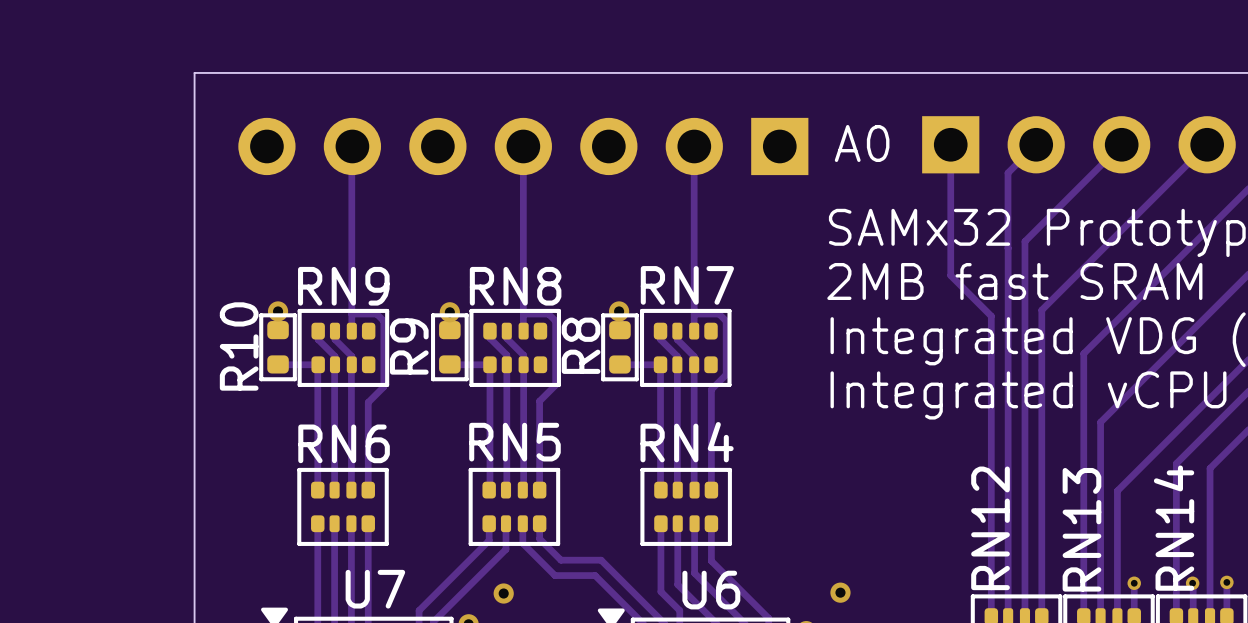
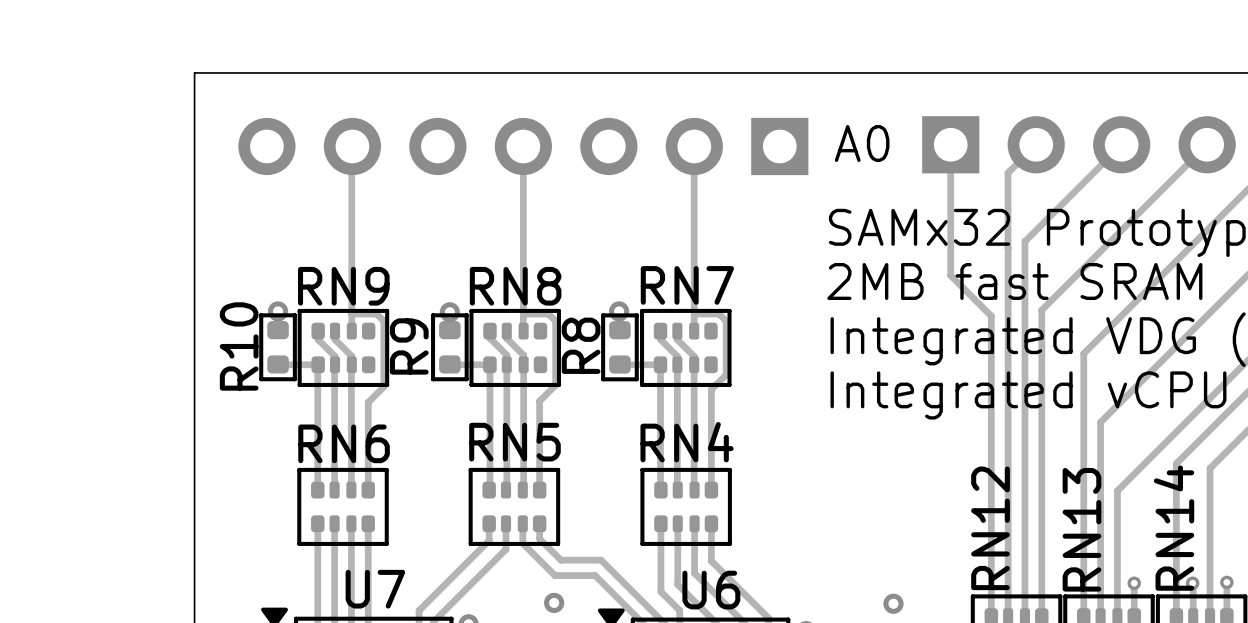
via position: (840, 592) -> (893, 603)
via position: (503, 593) -> (554, 602)

